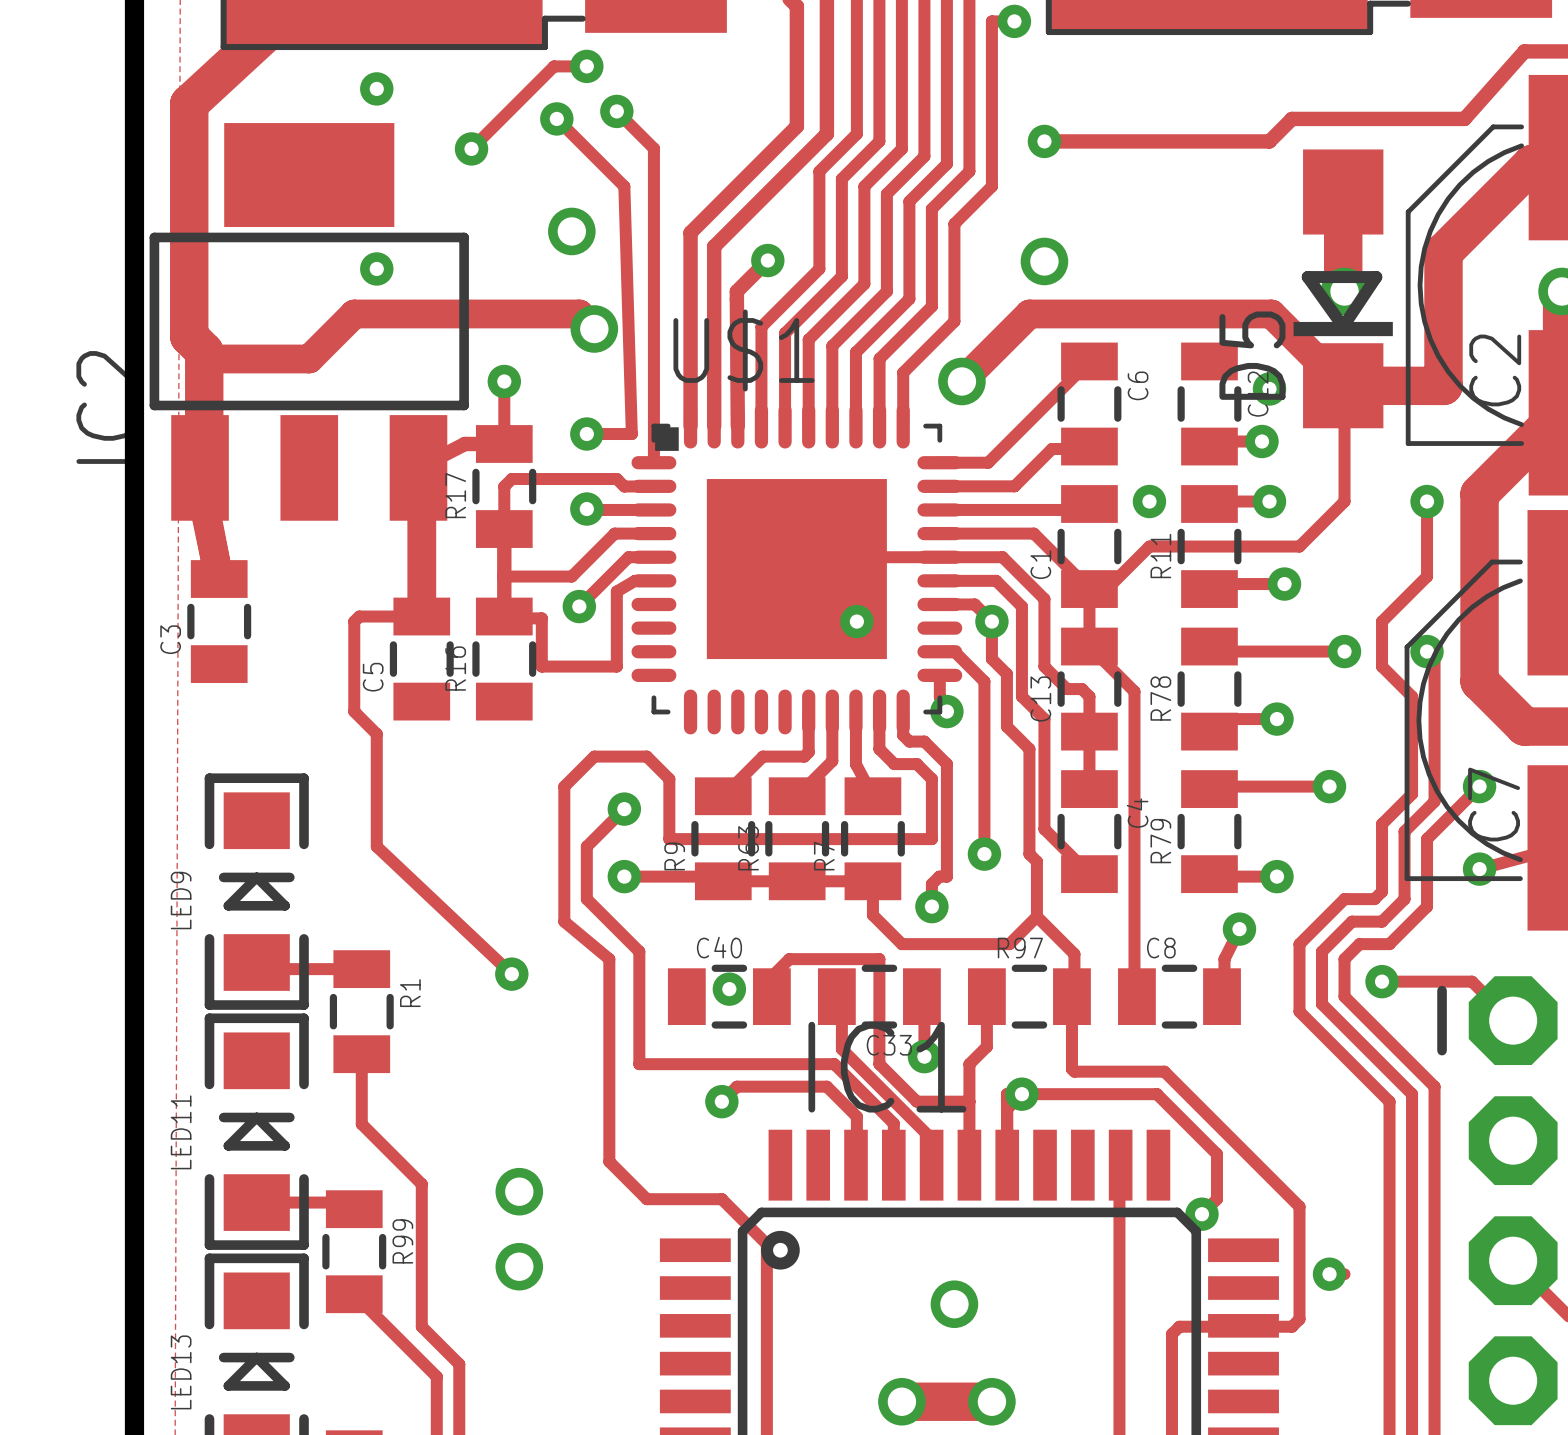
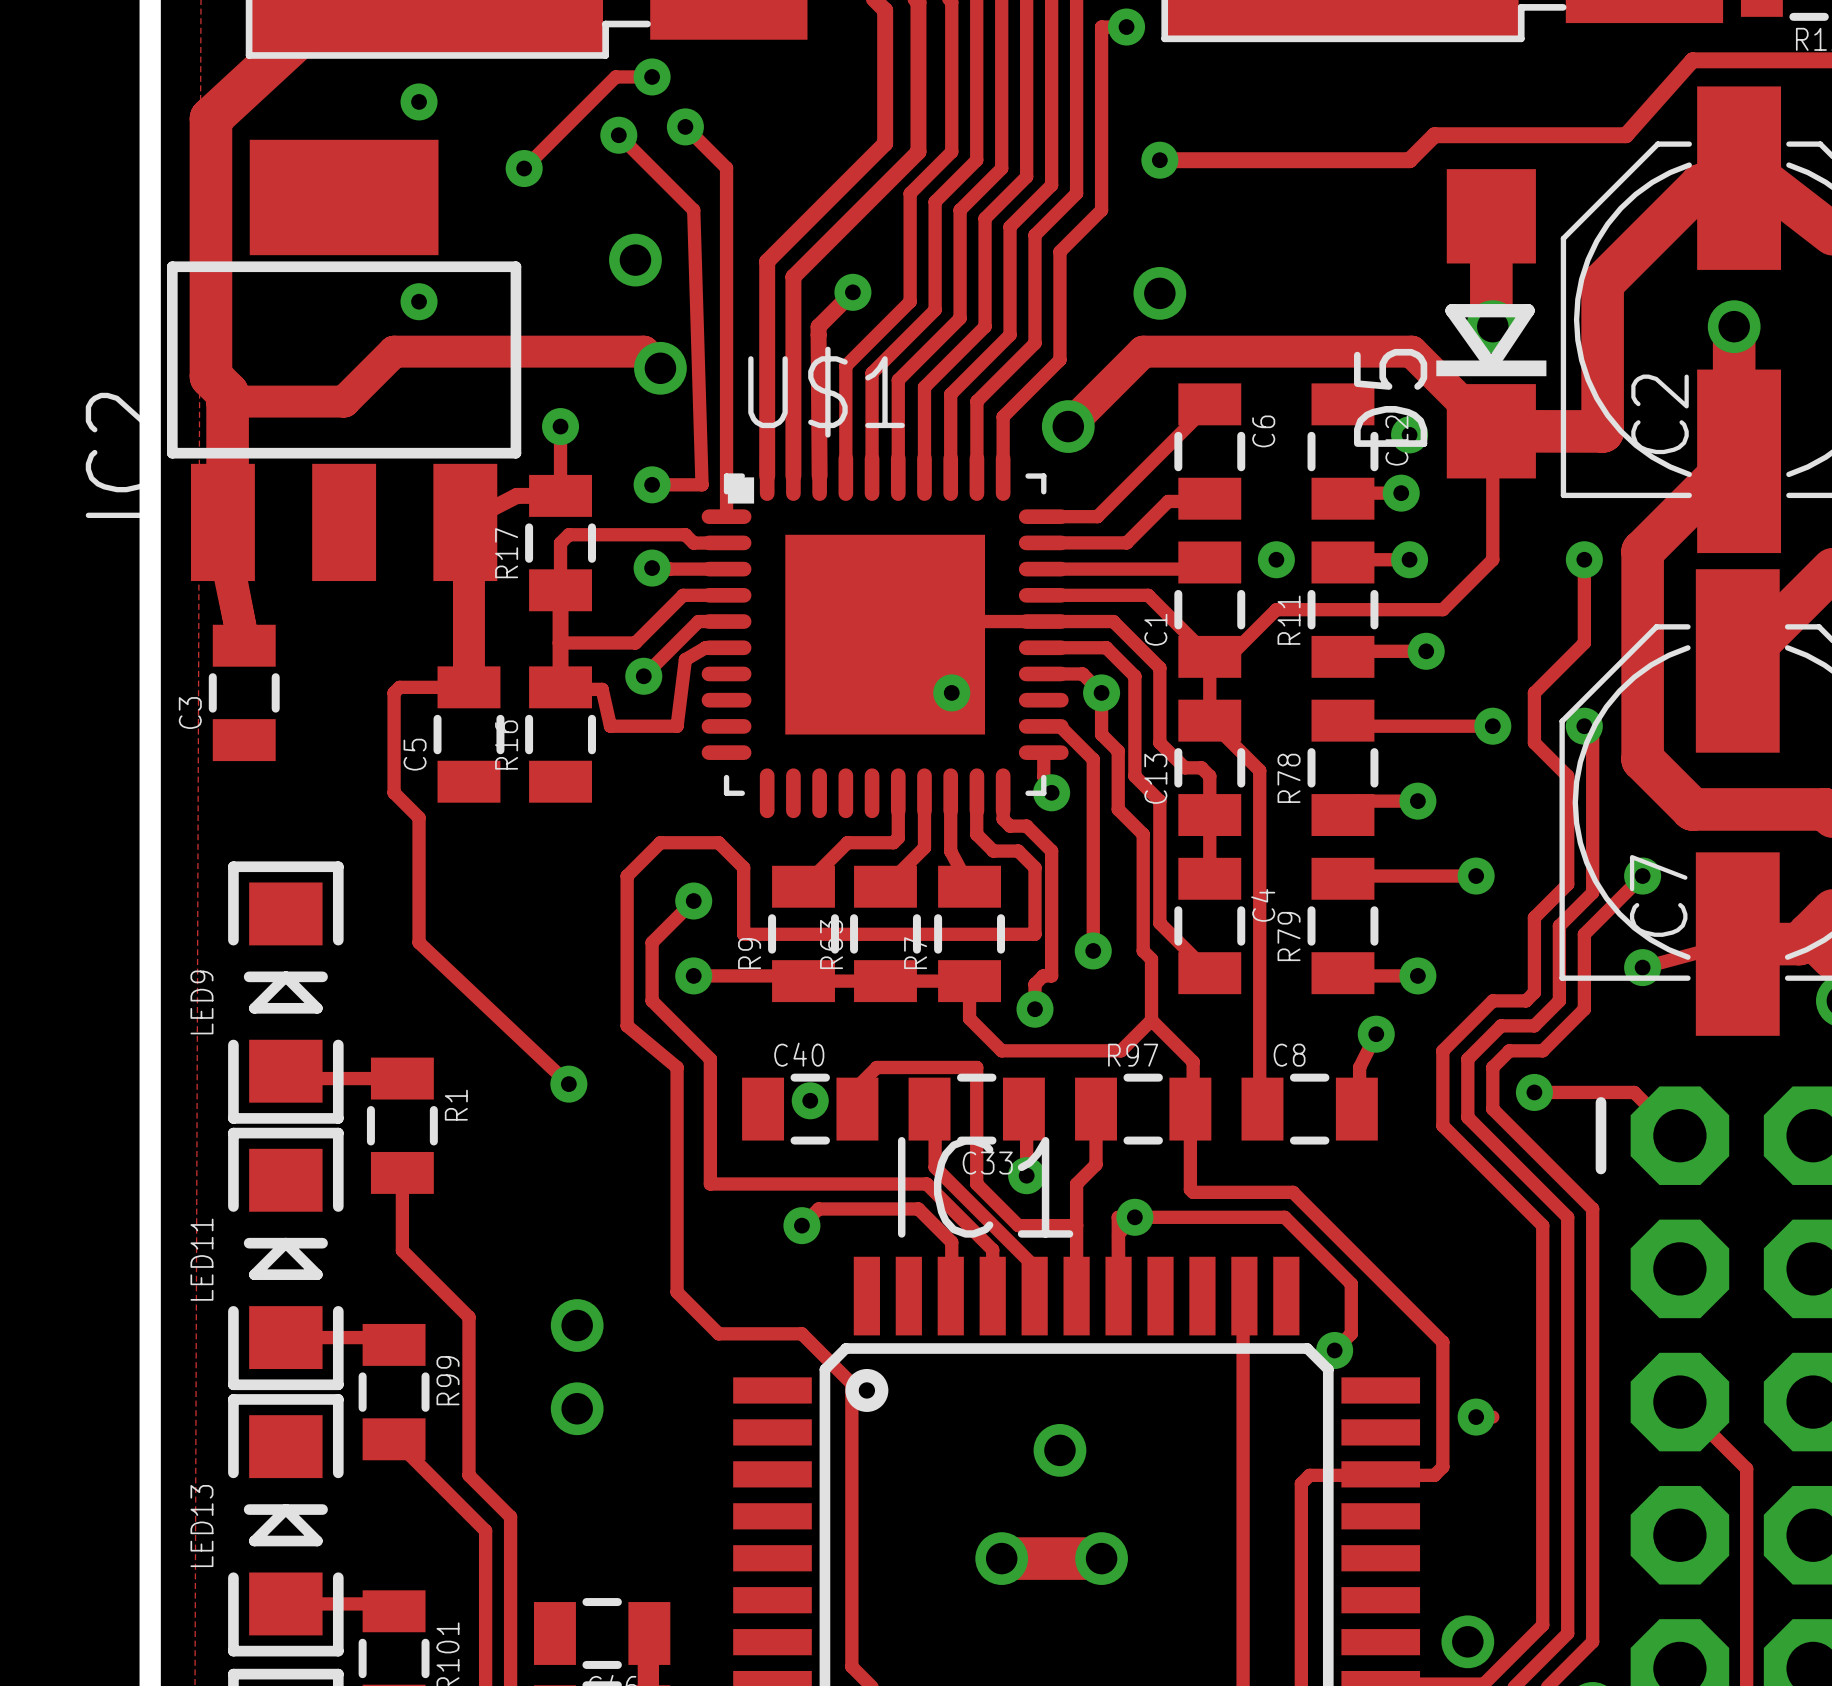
track: (616, 591) (616, 666) (541, 666) (541, 618) -> (685, 659) (677, 726) (610, 726) (602, 689)

